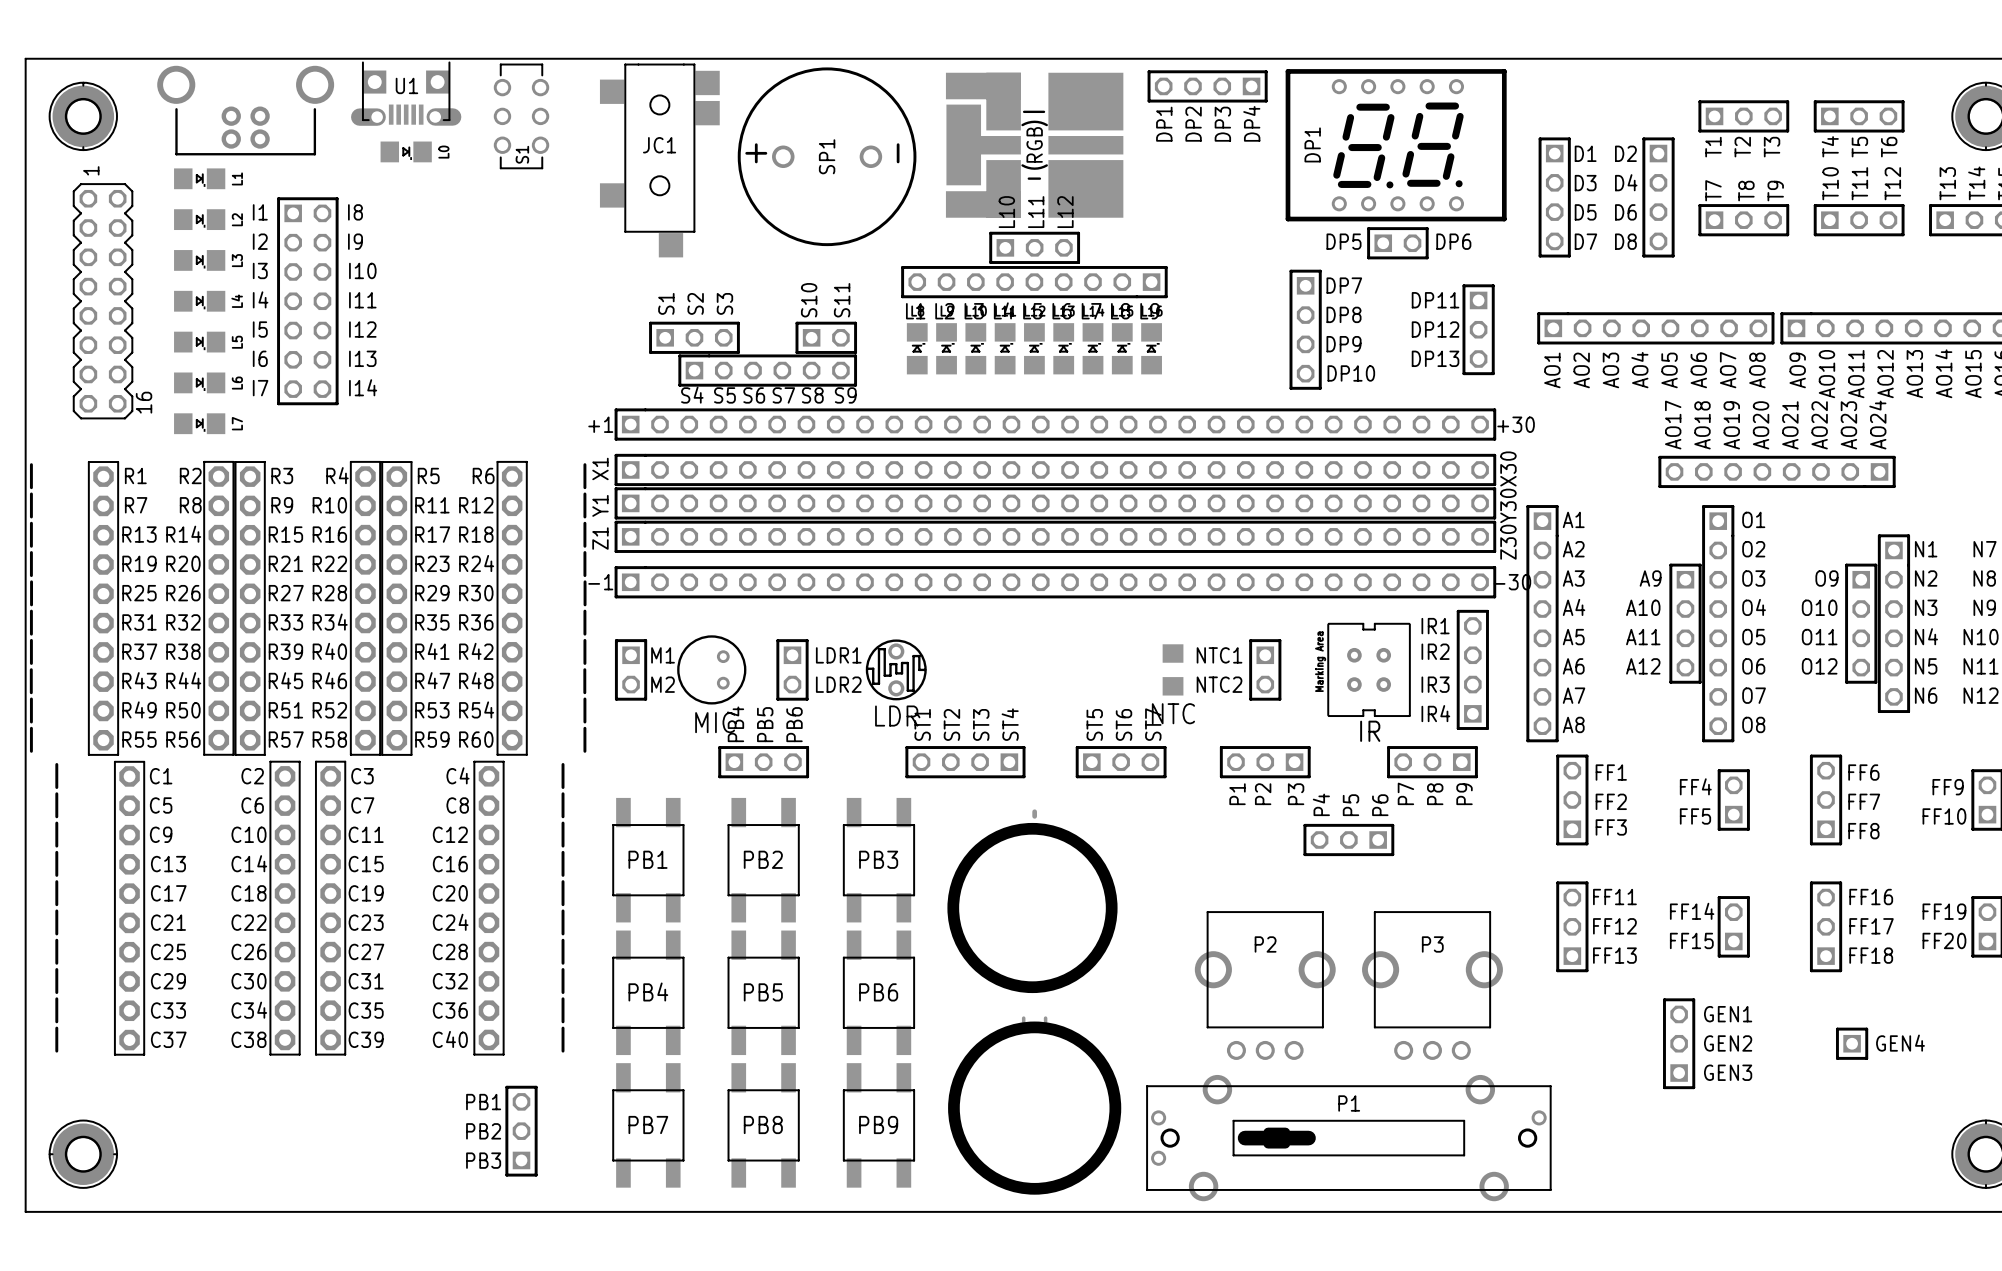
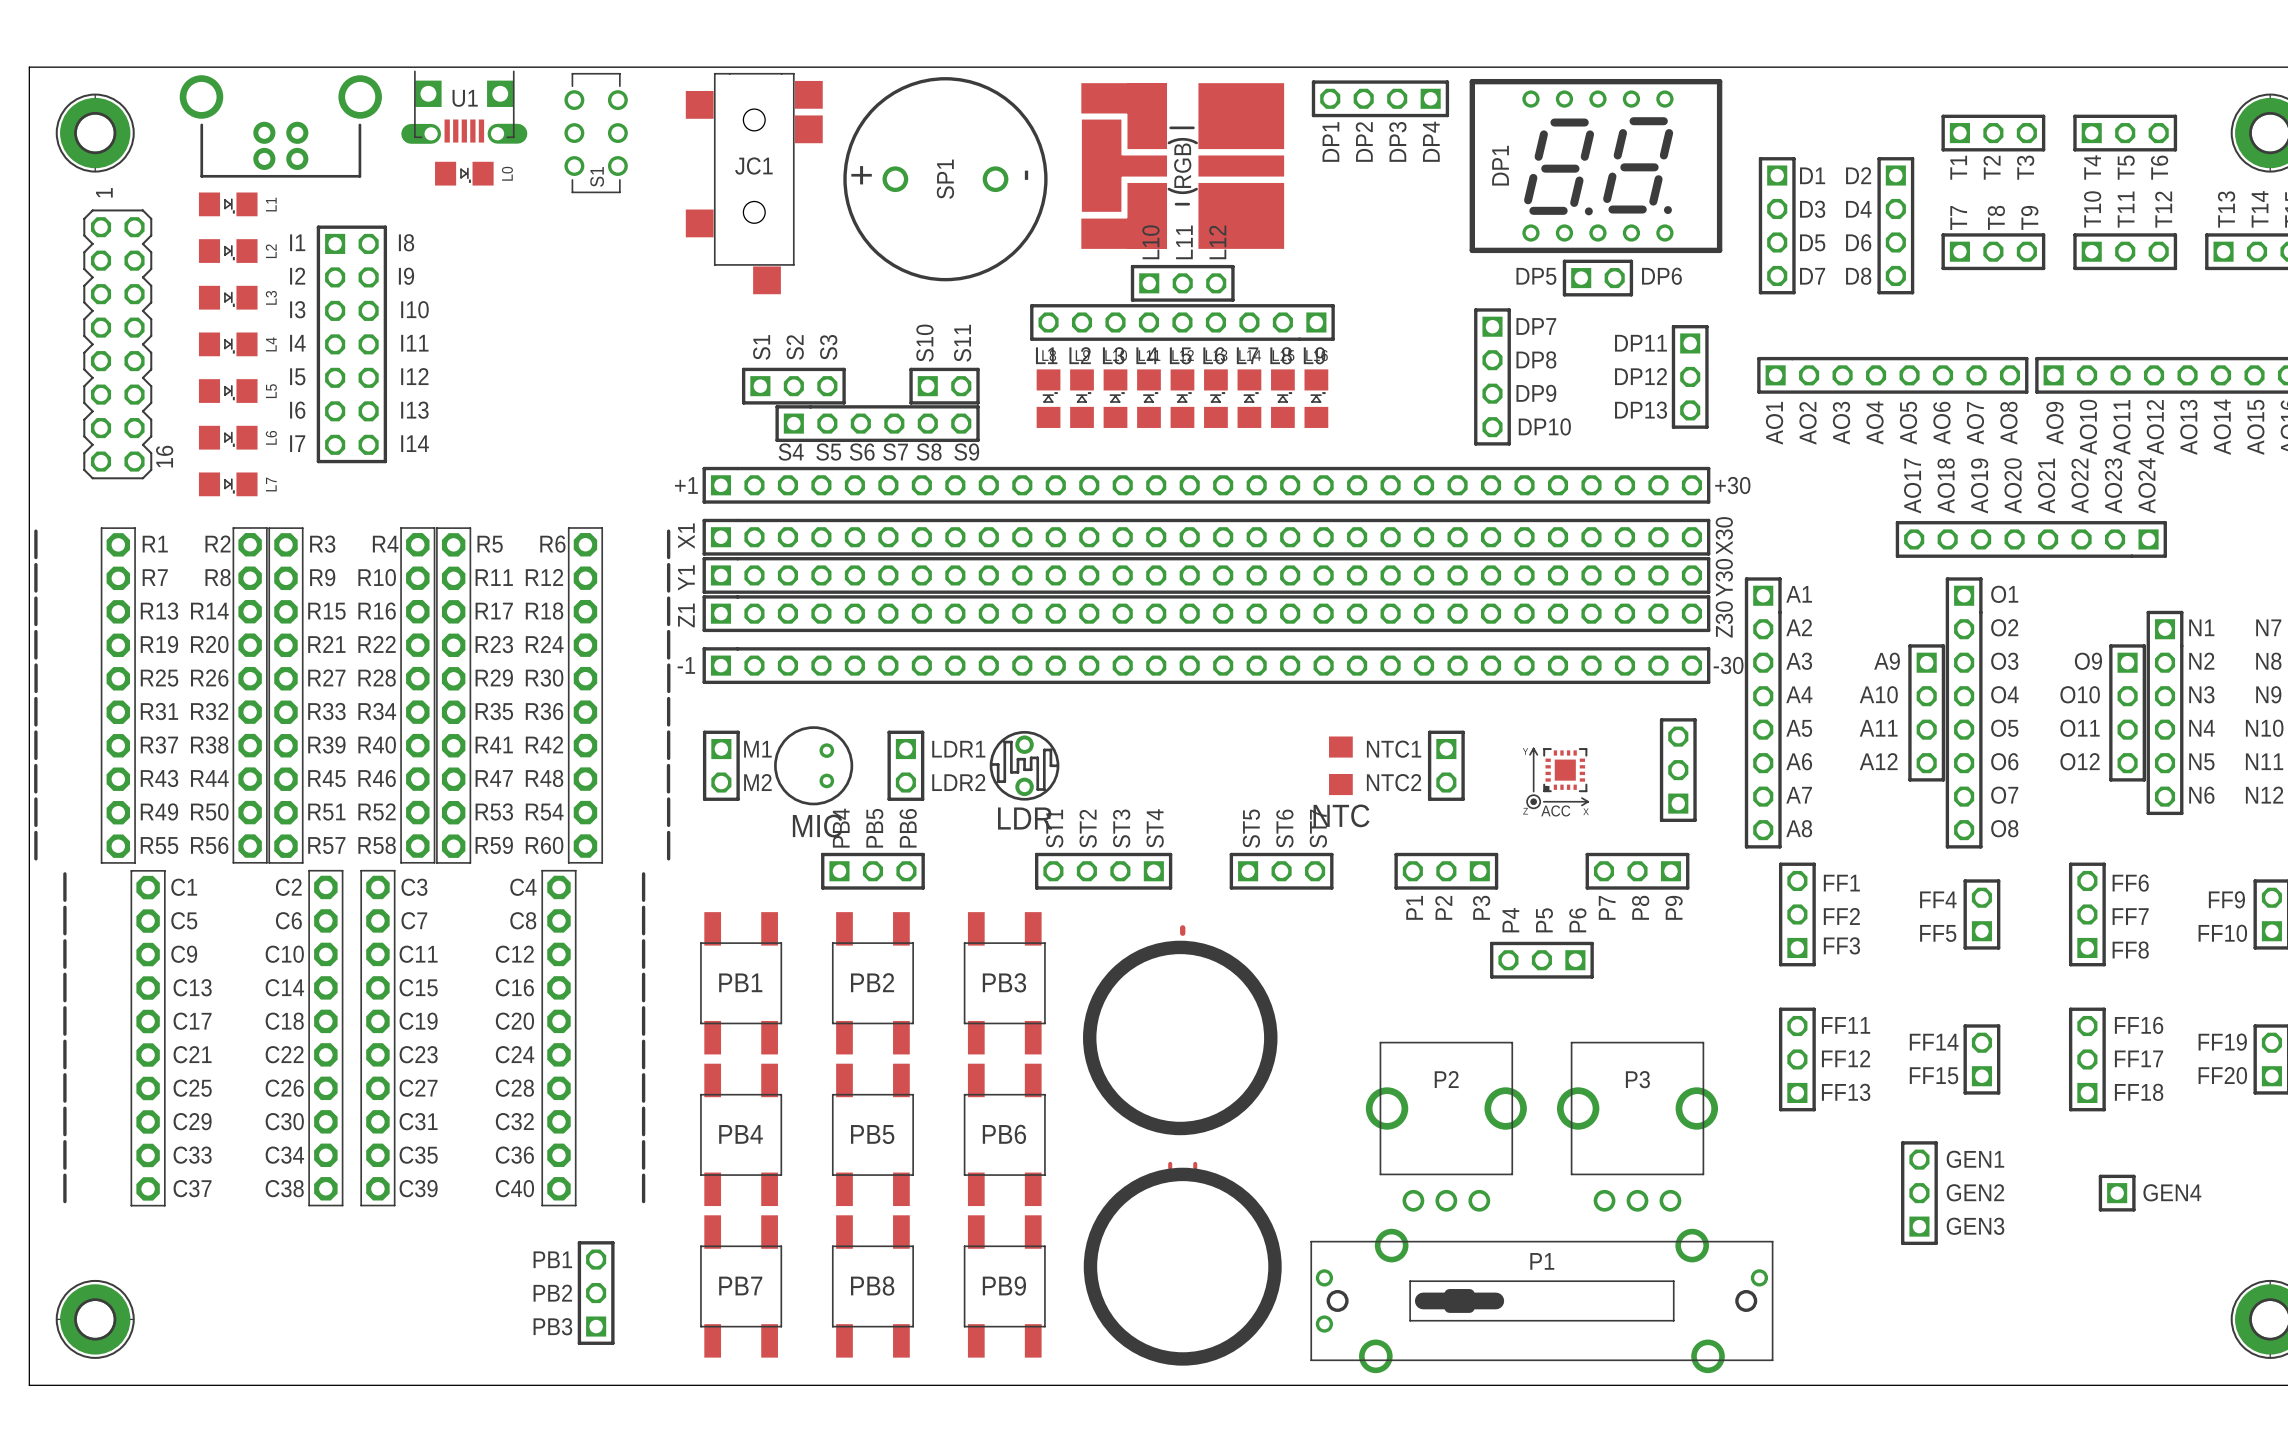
part footprint: [1456, 609, 1489, 730] -> [1659, 718, 1697, 823]
text: IR1 (1435, 626) -> none
text: IR2 (1435, 651) -> none
IR: (1369, 669) -> none
ACC: none -> (1557, 778)
text: IR3 (1435, 684) -> none
text: IR4 (1435, 713) -> none

